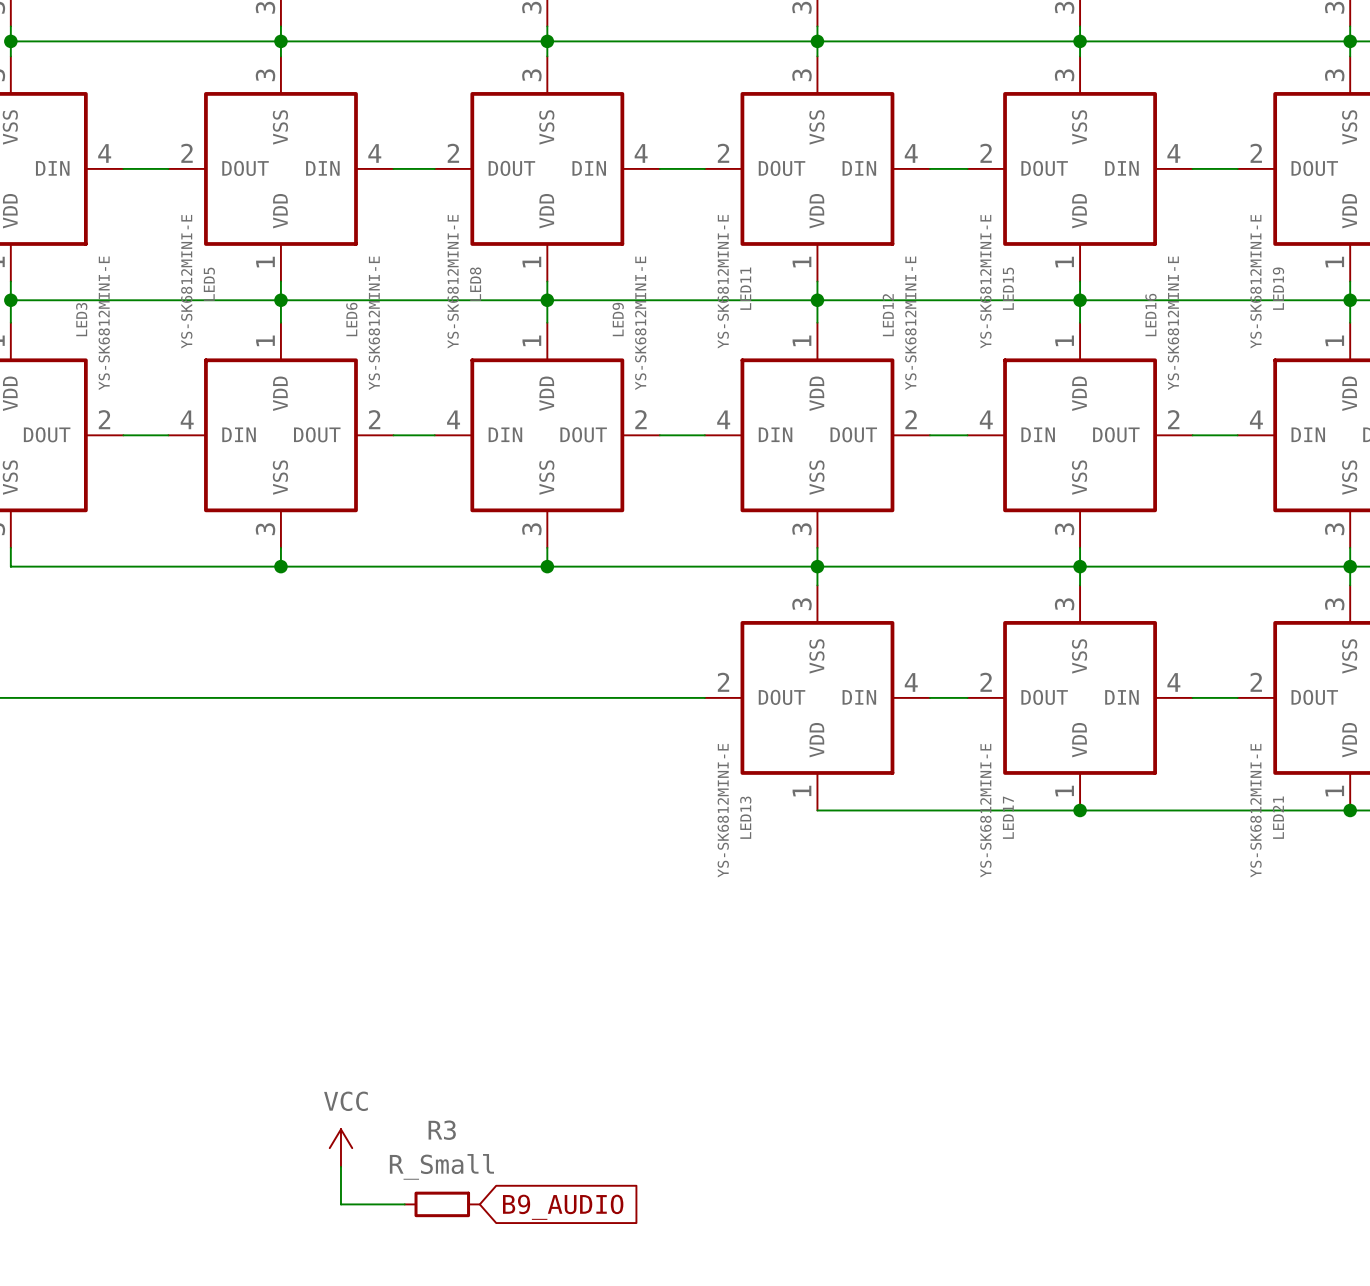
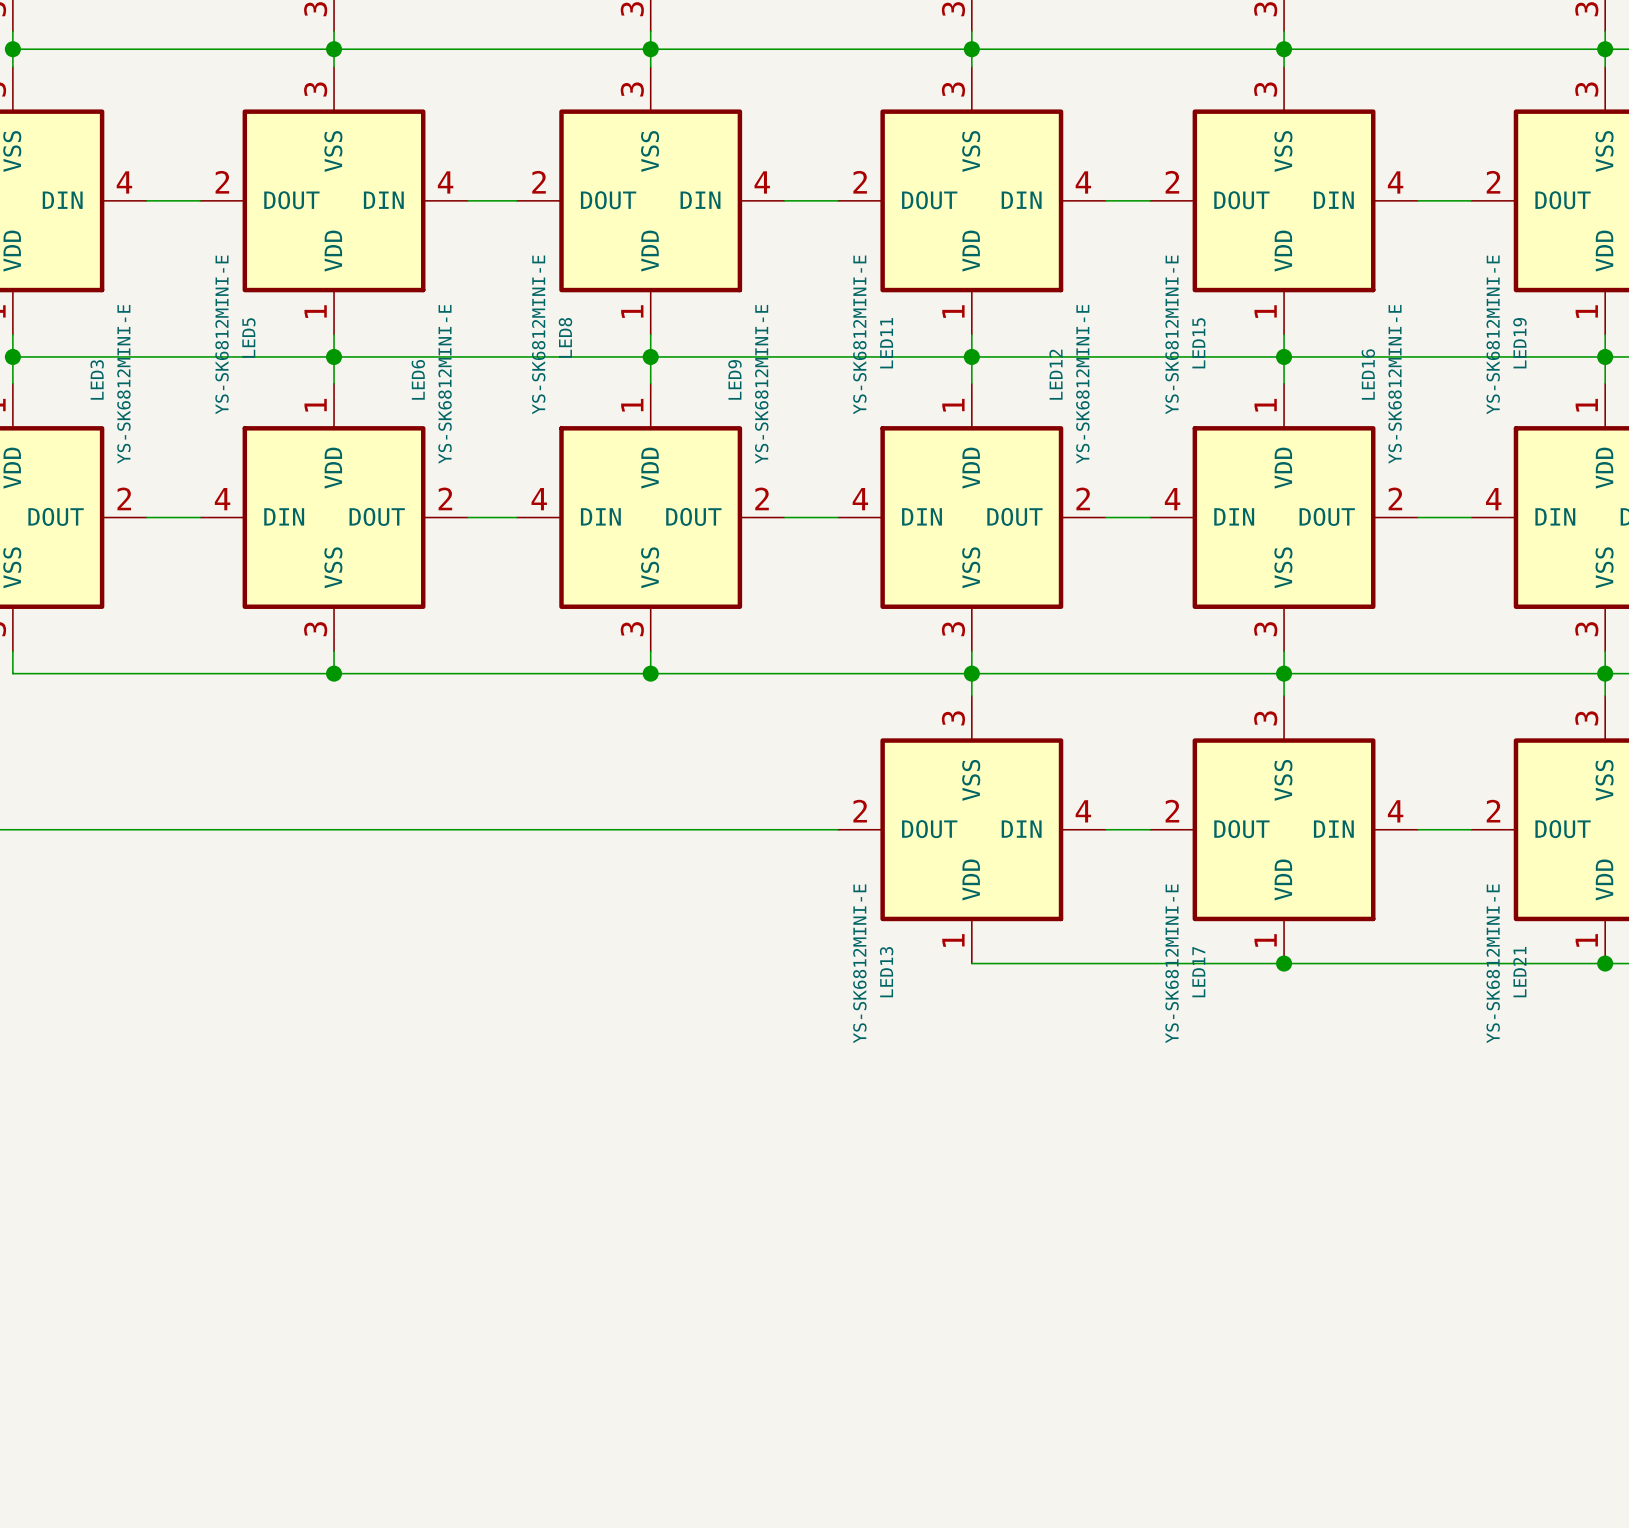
power symbol: VCC (340, 1148) -> none
wire: (340, 1166) (340, 1204) (404, 1204) -> none
R3: R_Small (442, 1204) -> none
global label: B9_AUDIO (563, 1207) -> none

